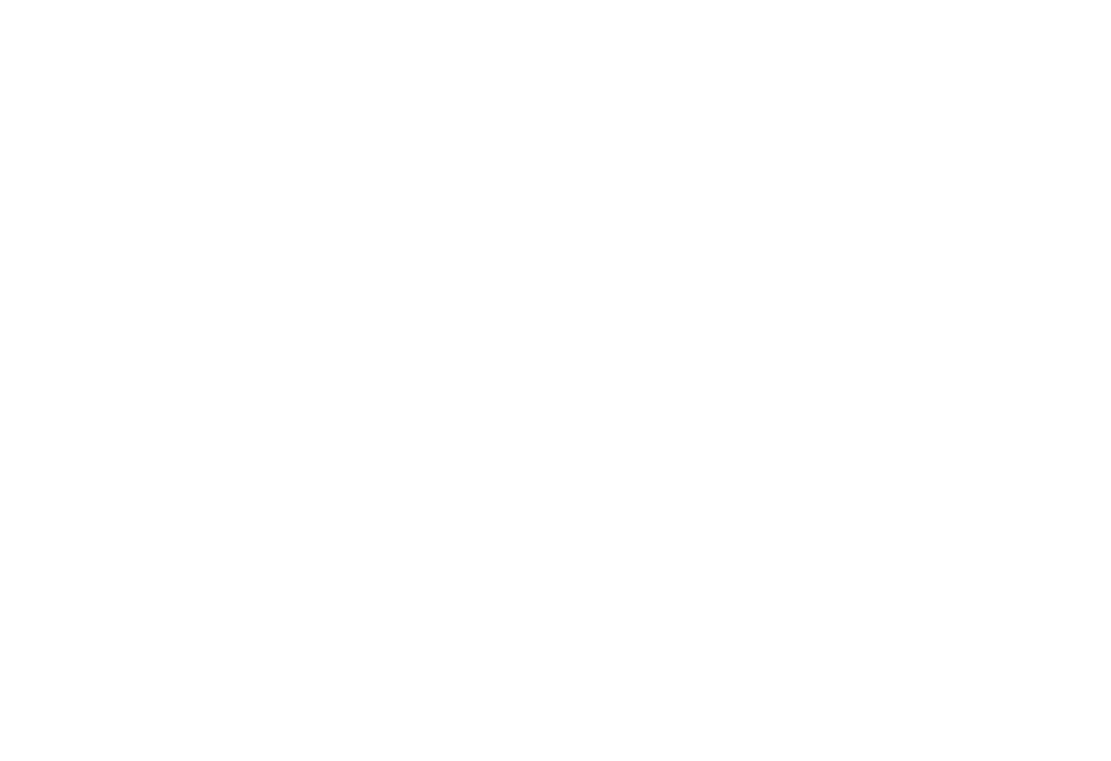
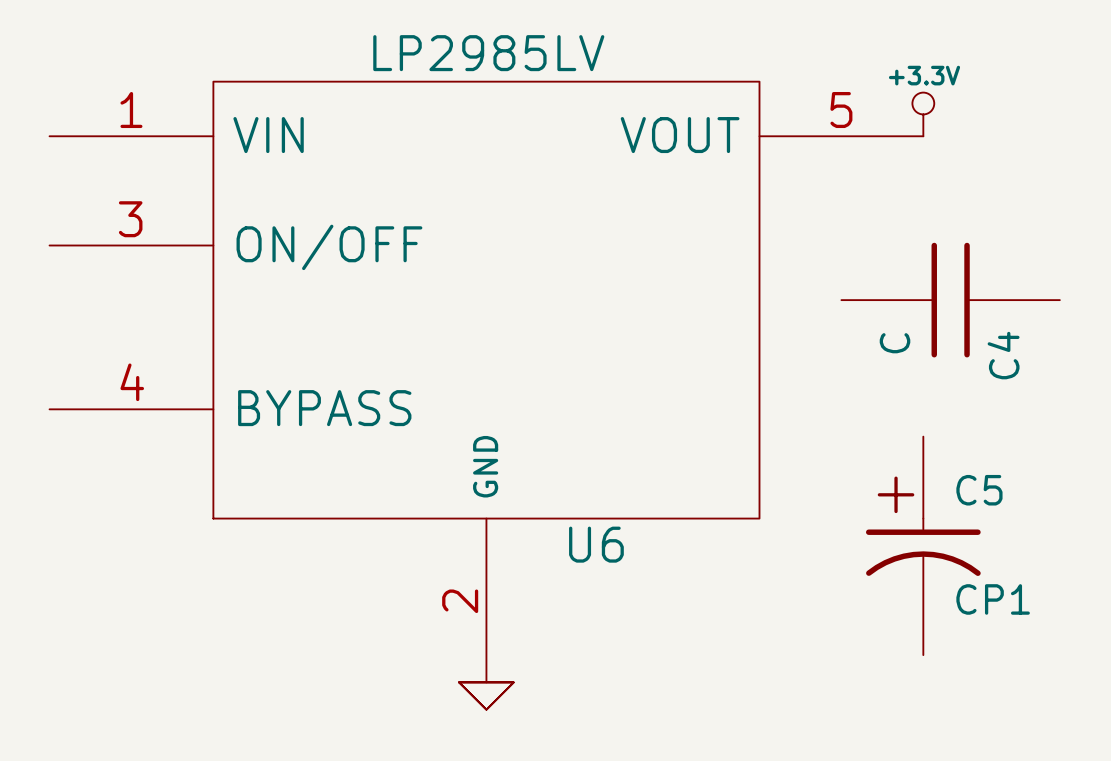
power symbol: none -> +3.3V (923, 114)
C4: none -> C (950, 300)
U6: none -> LP2985LV (486, 382)
C5: none -> CP1 (923, 545)
power symbol: none -> (486, 696)

